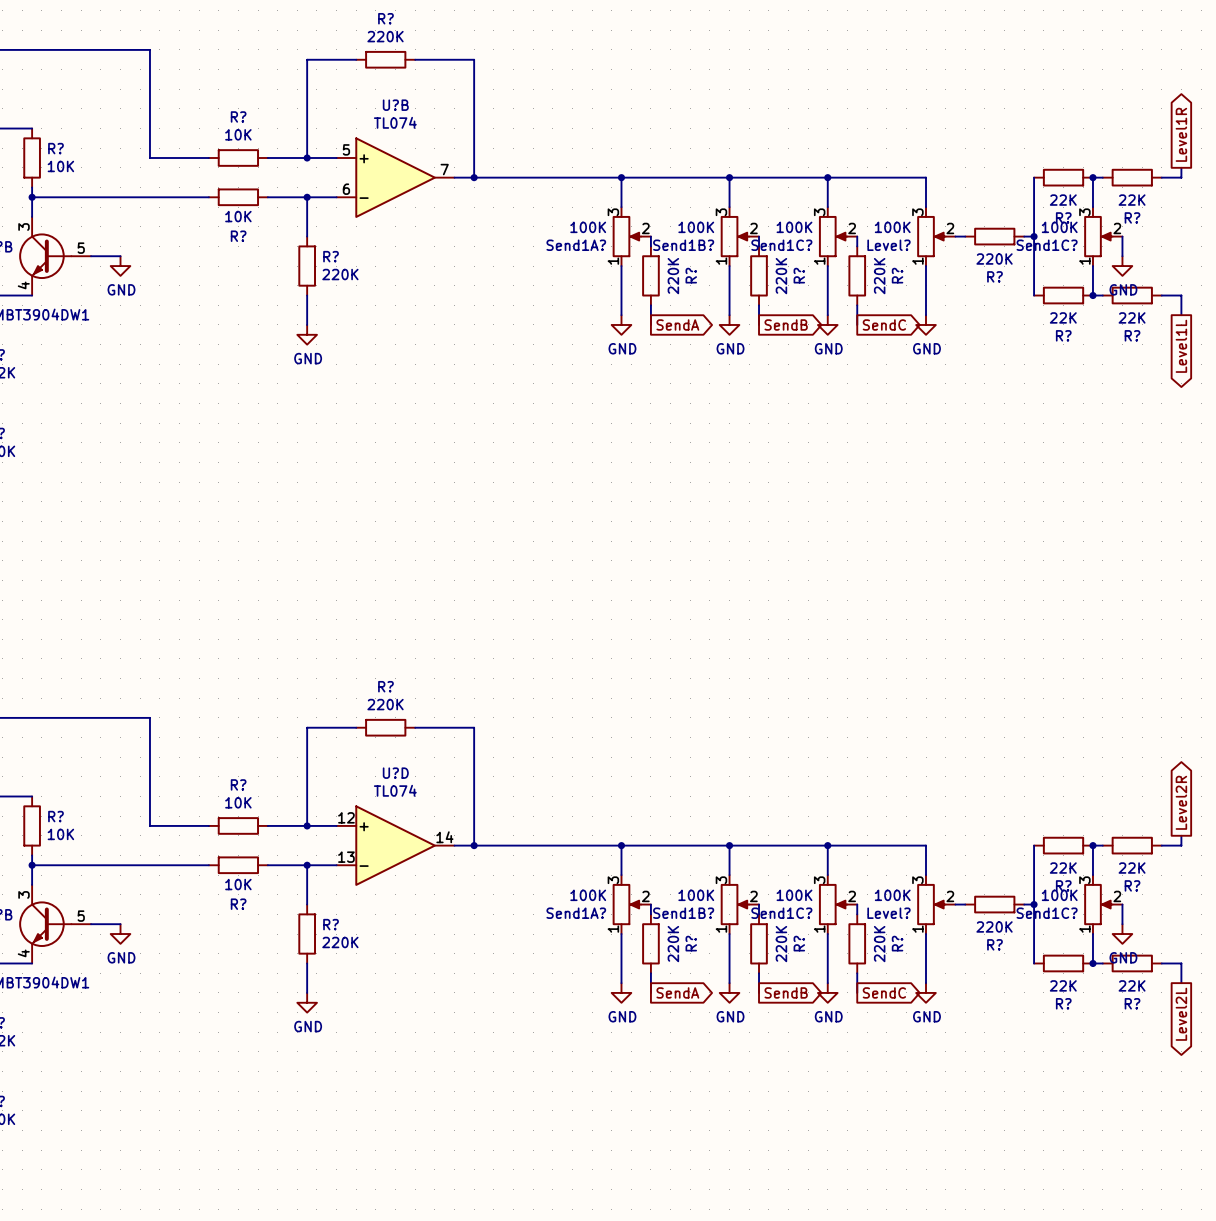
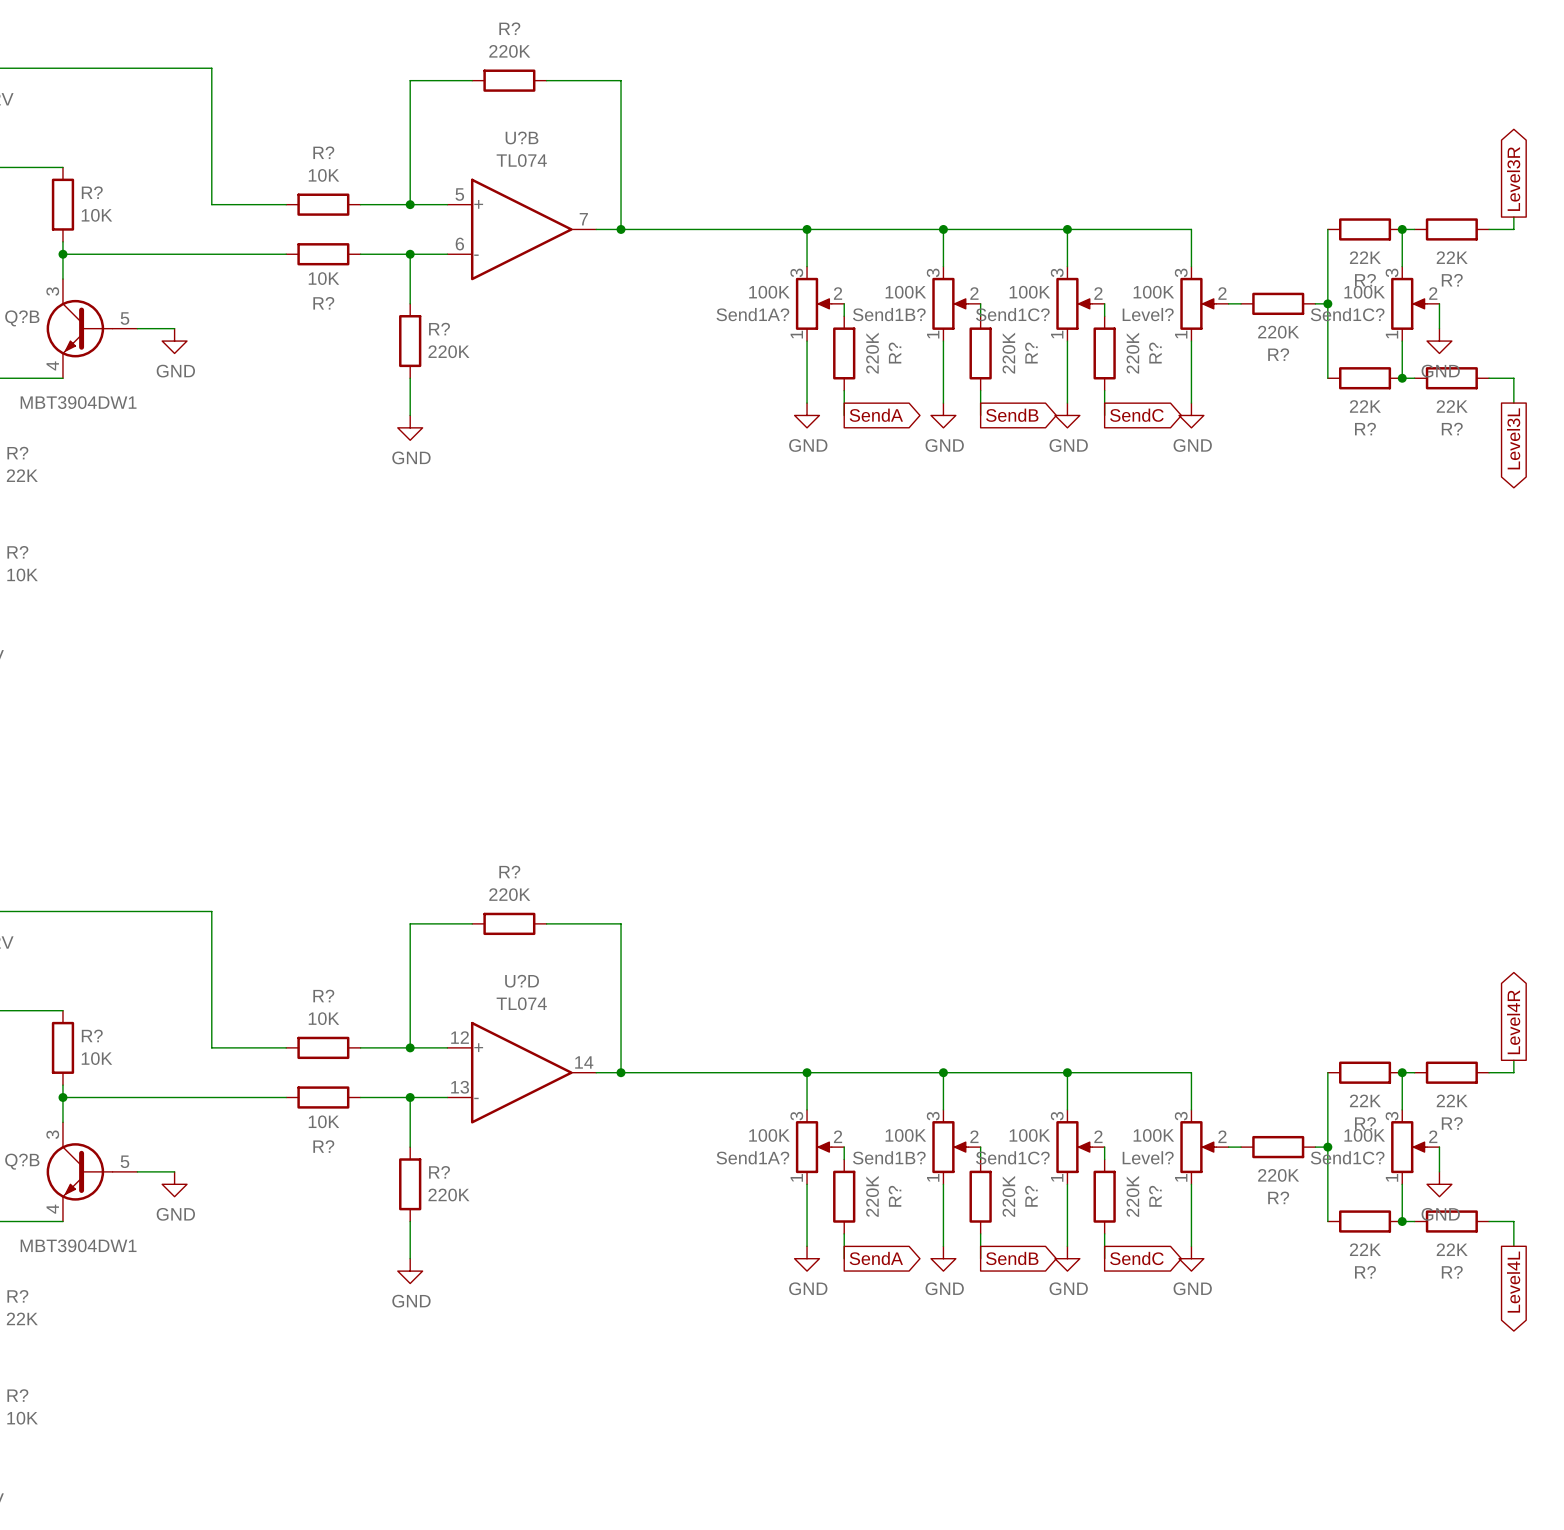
global label: Level1R (1181, 134) -> Level3R (1513, 179)
global label: Level1L (1181, 346) -> Level3L (1513, 438)
global label: Level2R (1181, 802) -> Level4R (1513, 1022)
global label: Level2L (1181, 1014) -> Level4L (1513, 1282)

